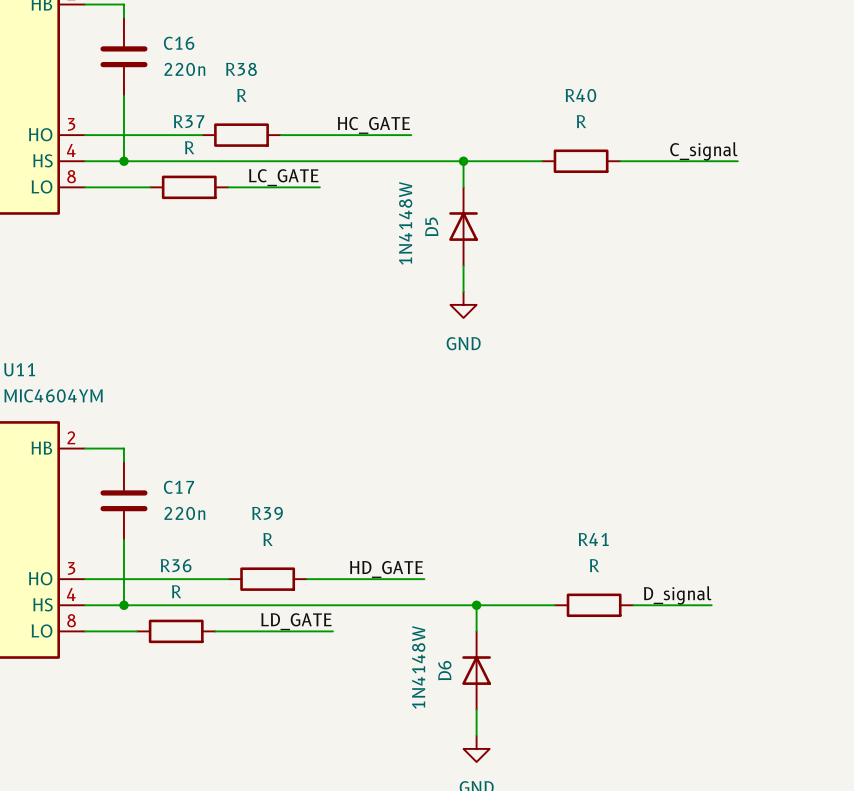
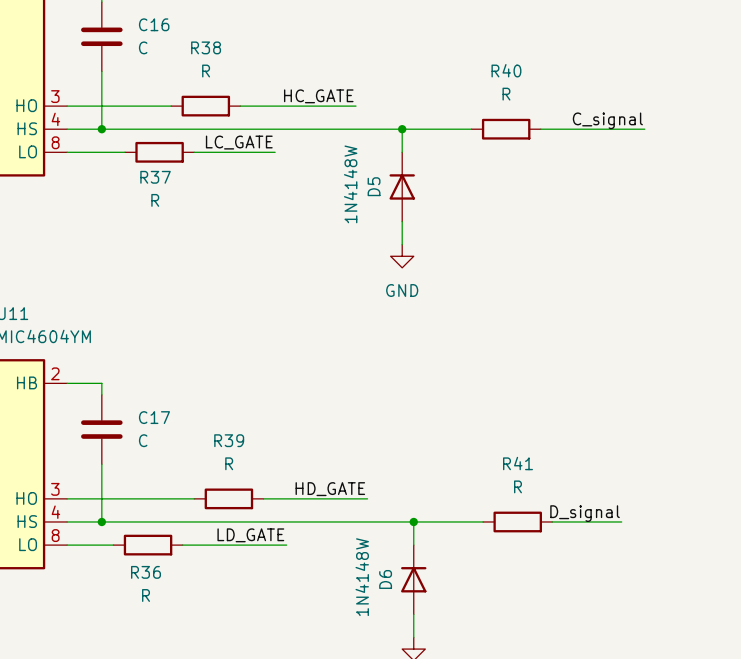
C16 value: 220n (184, 69) -> C (143, 47)
R37 name position: R37 (189, 121) -> R37 (155, 177)
R37 value position: R (189, 147) -> R (155, 200)
C17 value: 220n (184, 513) -> C (143, 440)
R36 name position: R36 (176, 565) -> R36 (146, 572)
R36 value position: R (176, 591) -> R (146, 595)

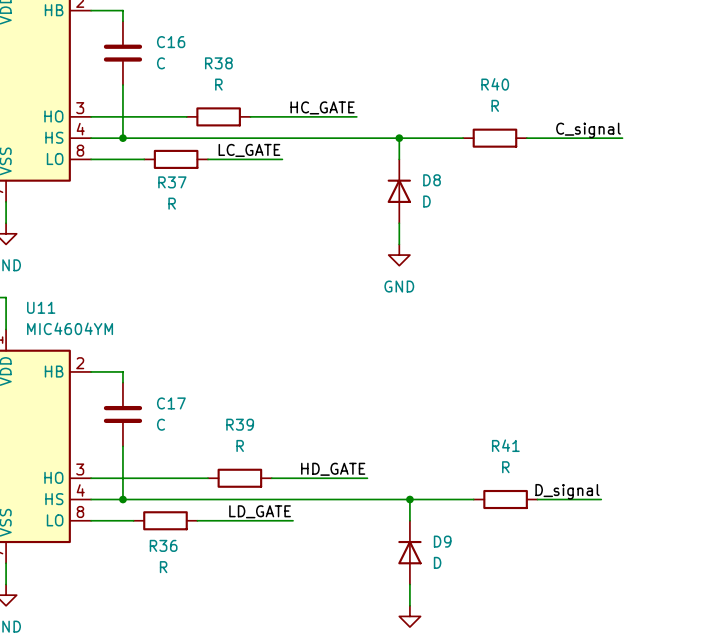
D5 value: 1N4148W (350, 184) -> D (426, 201)
D5 name: D5 (374, 186) -> D8 (432, 180)
D6 value: 1N4148W (362, 577) -> D (437, 562)
D6 name: D6 (385, 579) -> D9 (442, 541)

